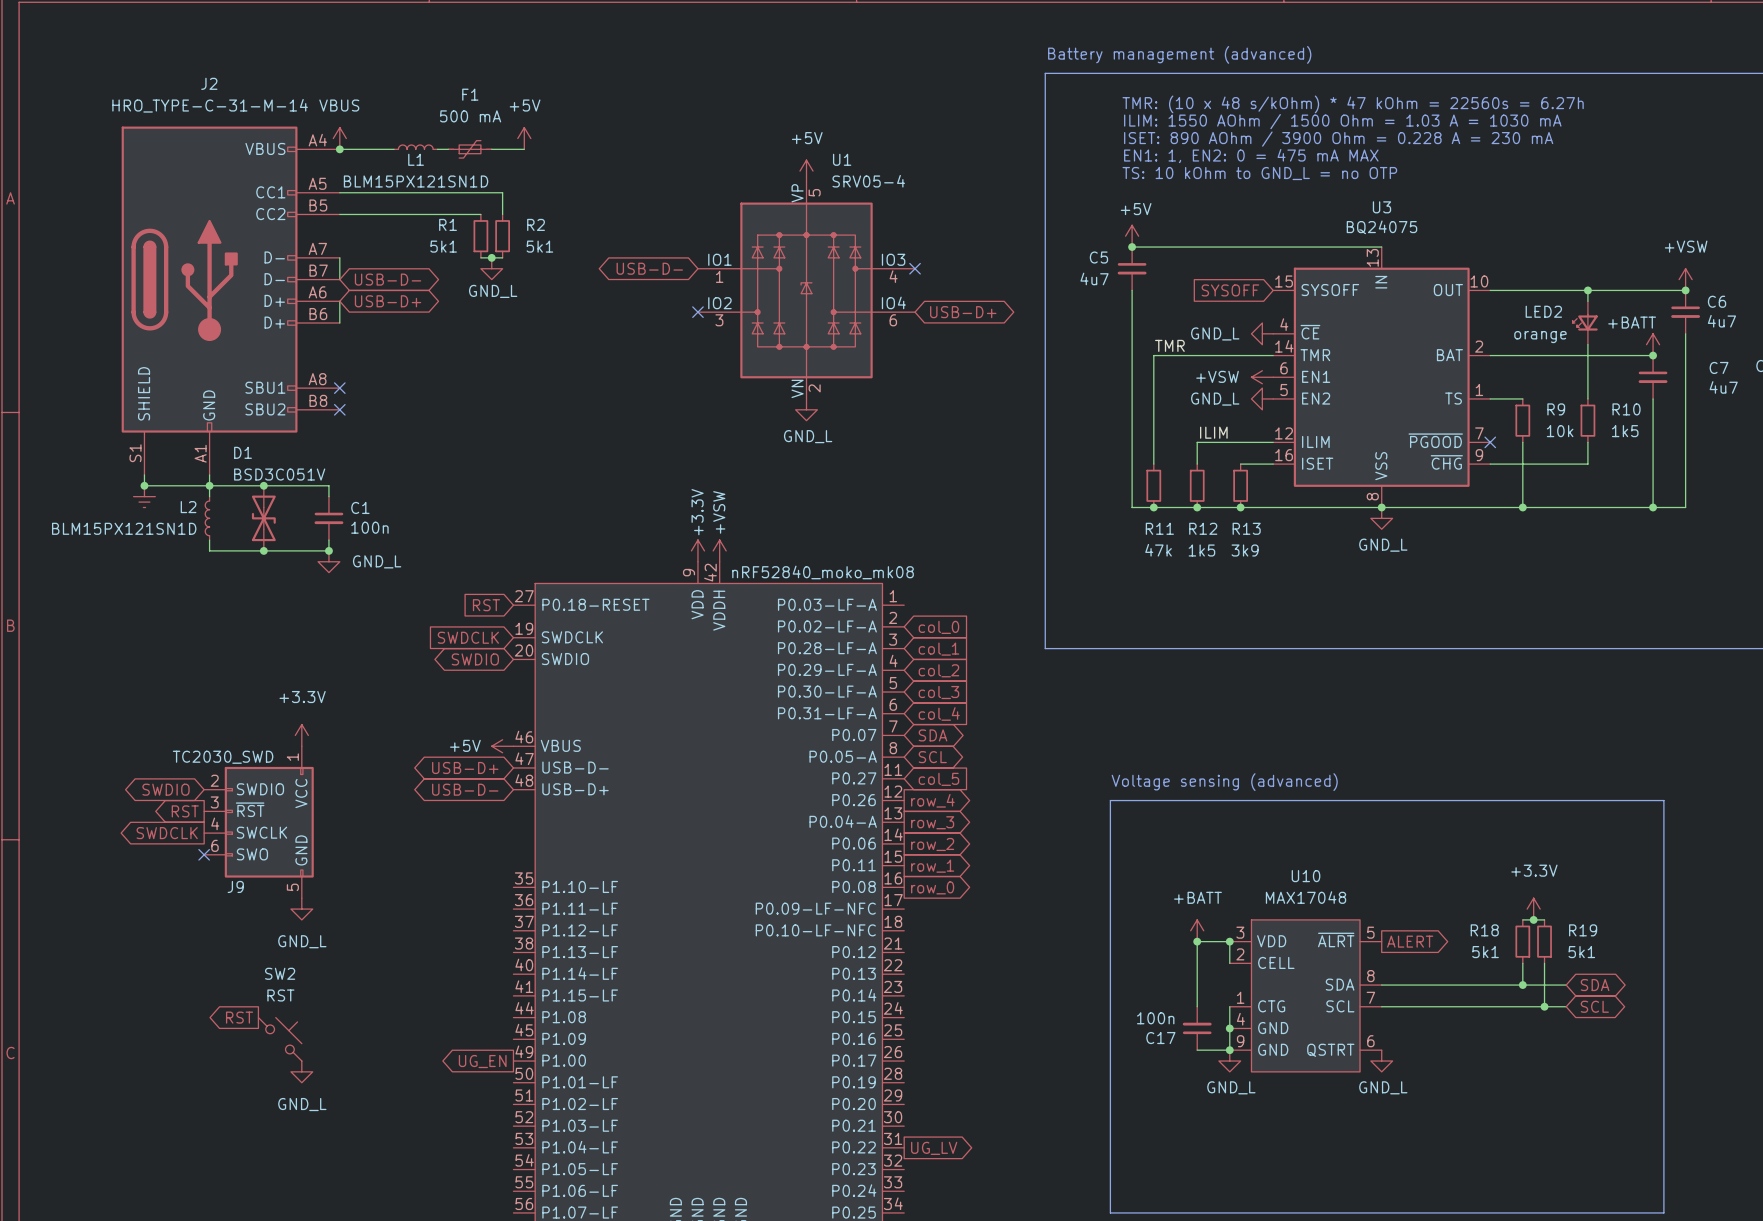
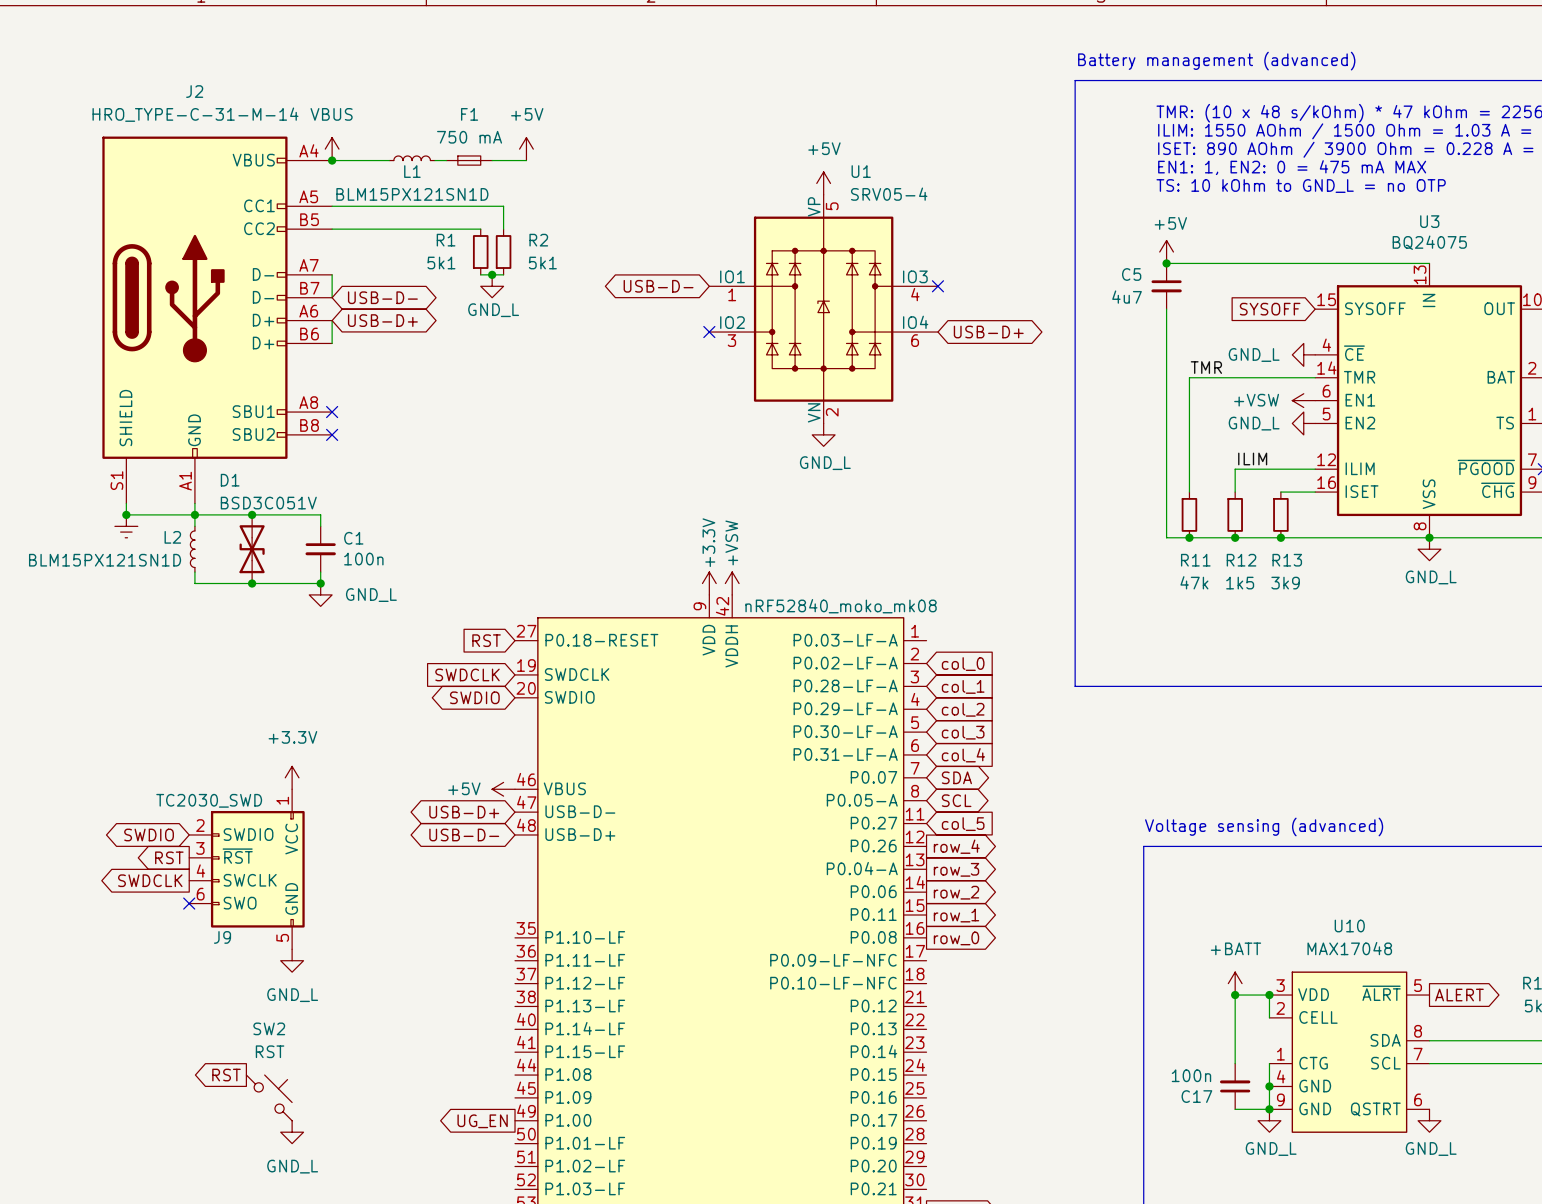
F1 value: 500 mA (470, 116) -> 750 mA (469, 137)
F1 symbol: [448, 140, 492, 159] -> [446, 155, 493, 166]

